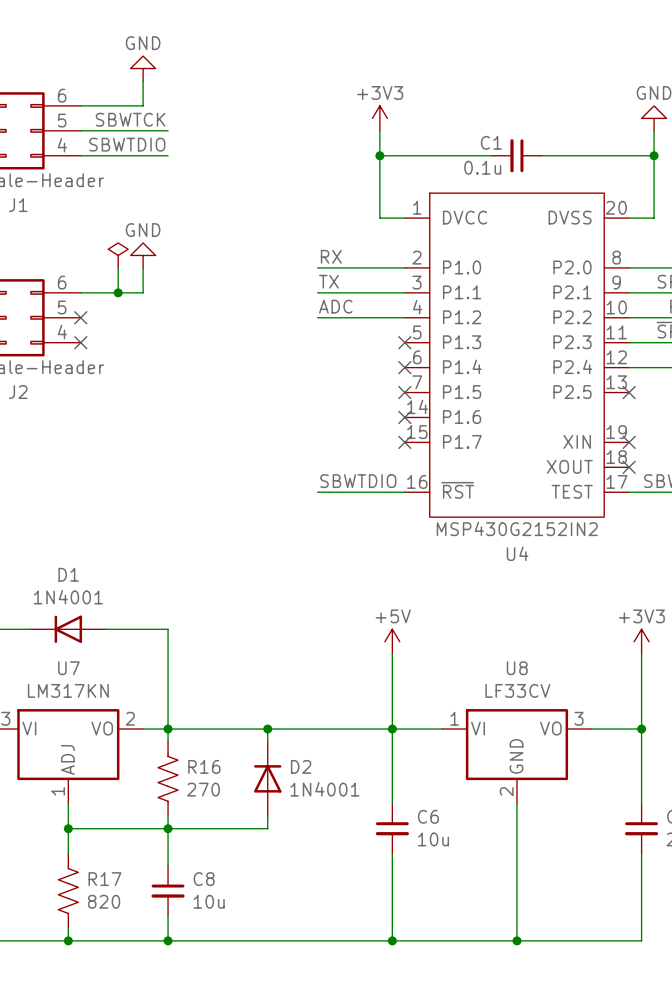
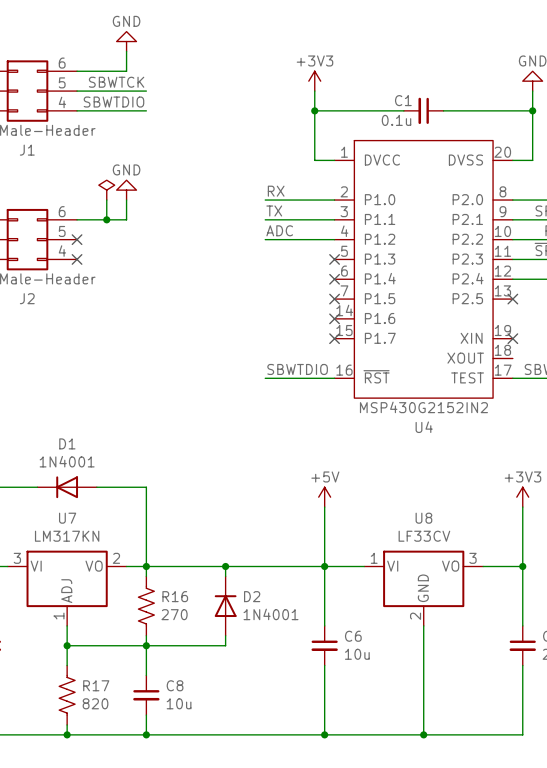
no-connect mark: (629, 467) -> none

